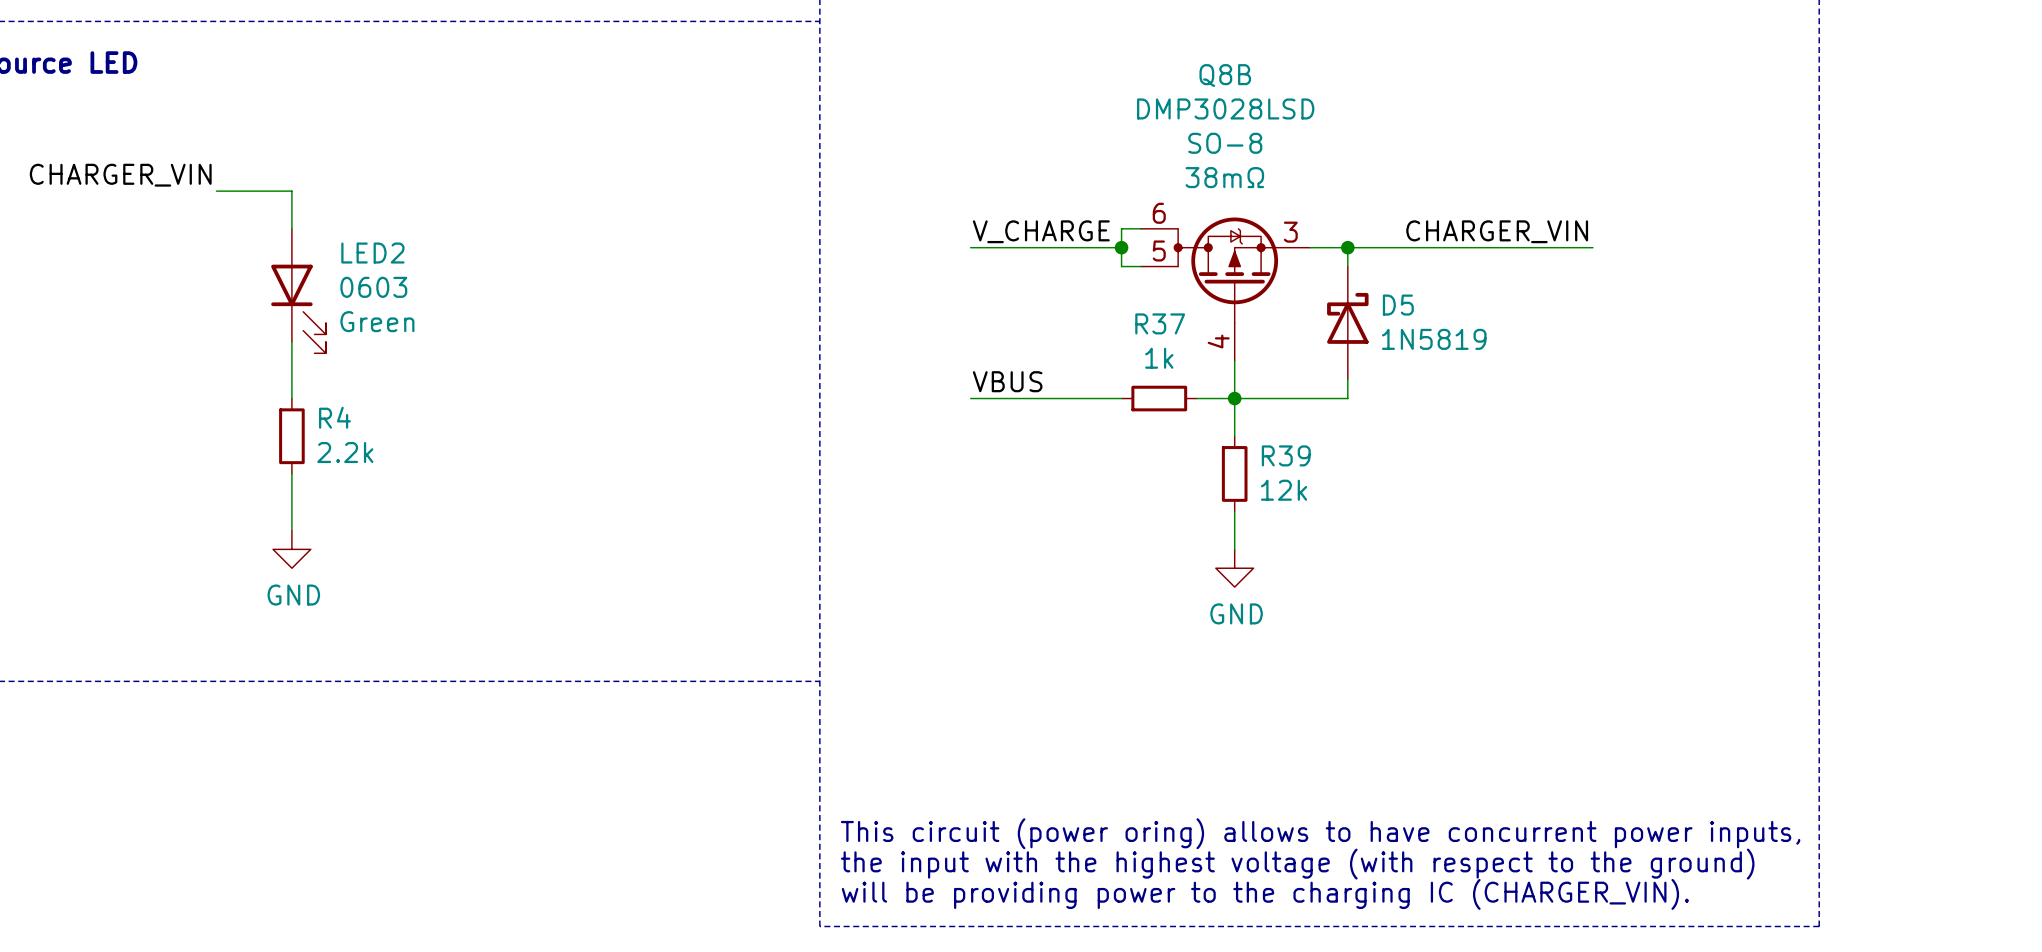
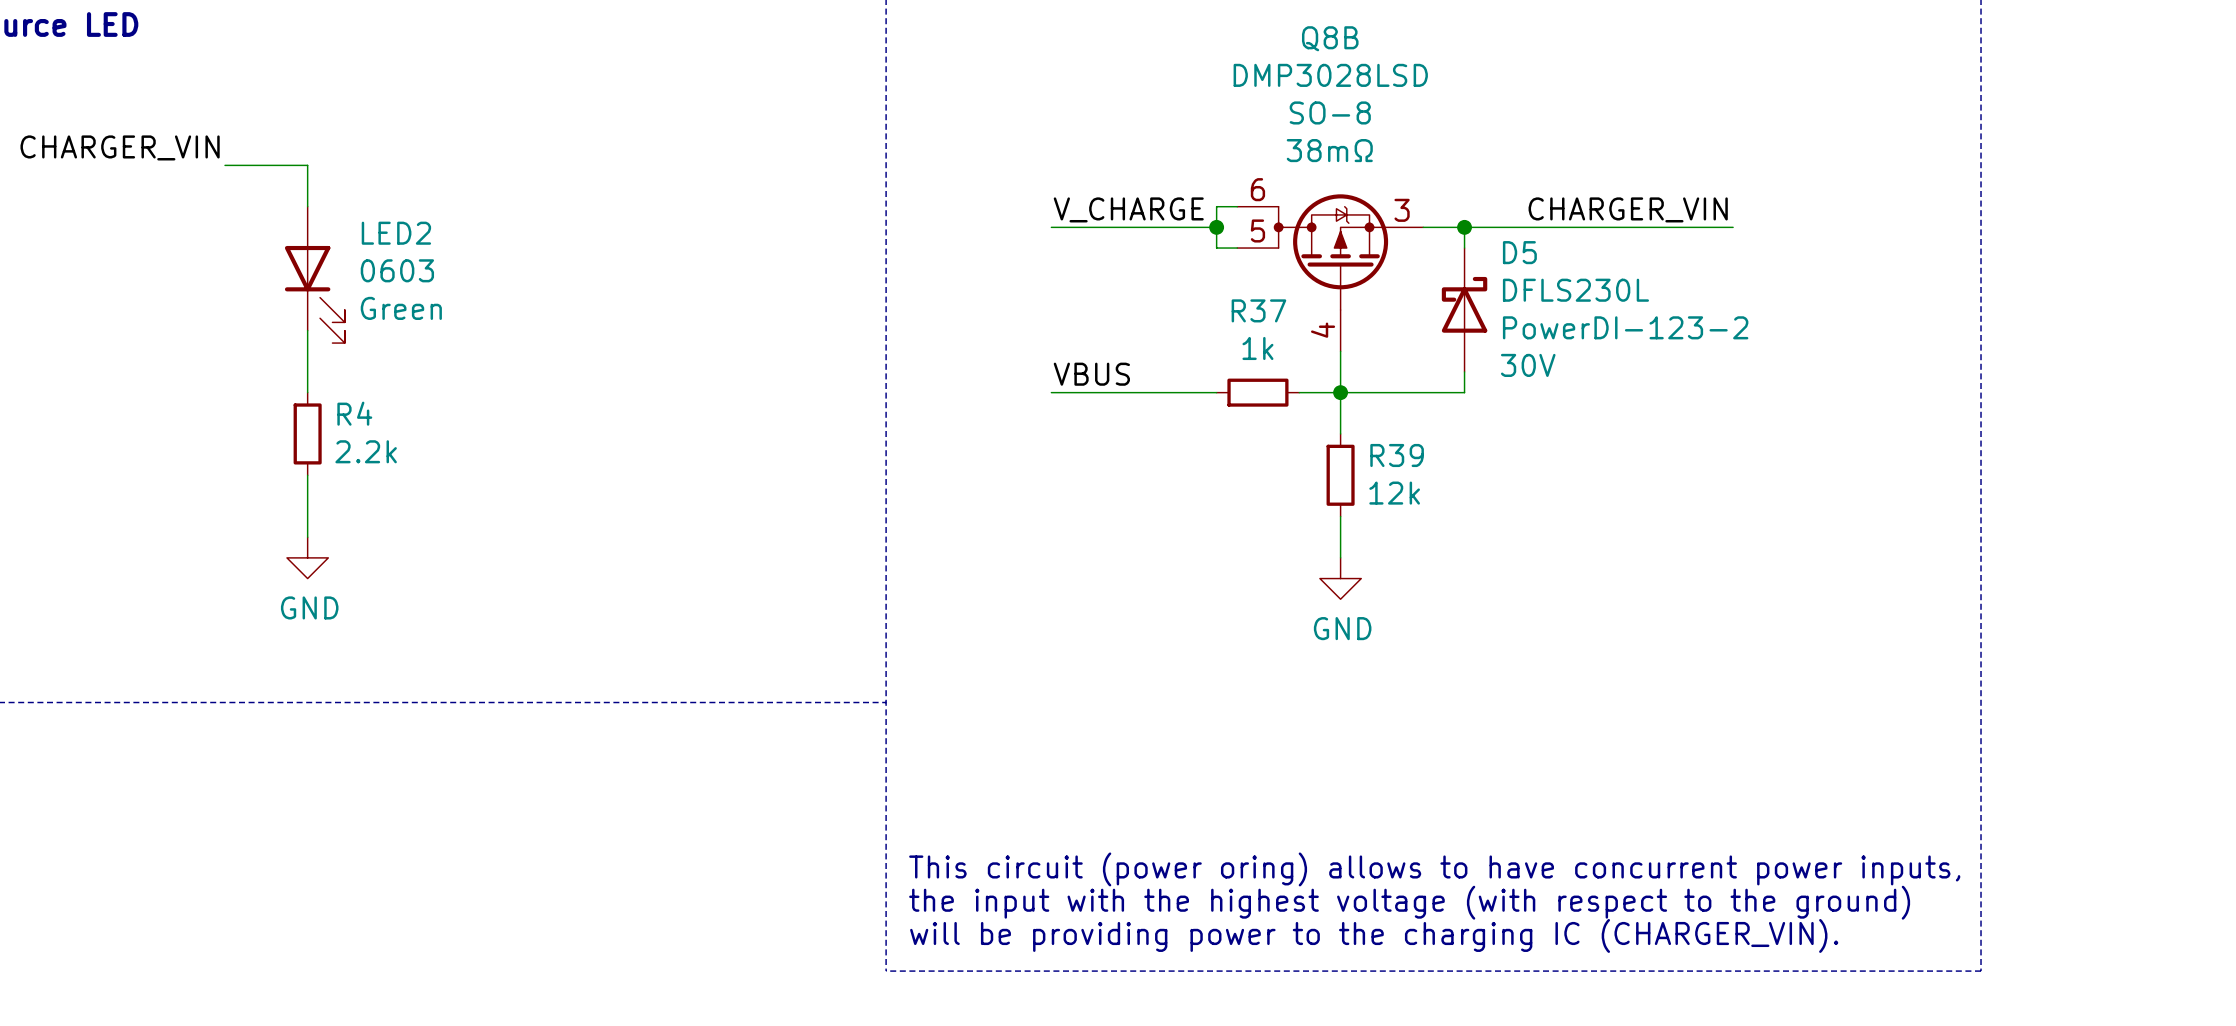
D5 name position: D5 (1398, 305) -> D5 (1519, 252)
D5 value: 1N5819 (1434, 339) -> DFLS230L (1575, 290)
D5 text: none -> PowerDI-123-2 (1625, 327)
D5 text: none -> 30V (1528, 365)

